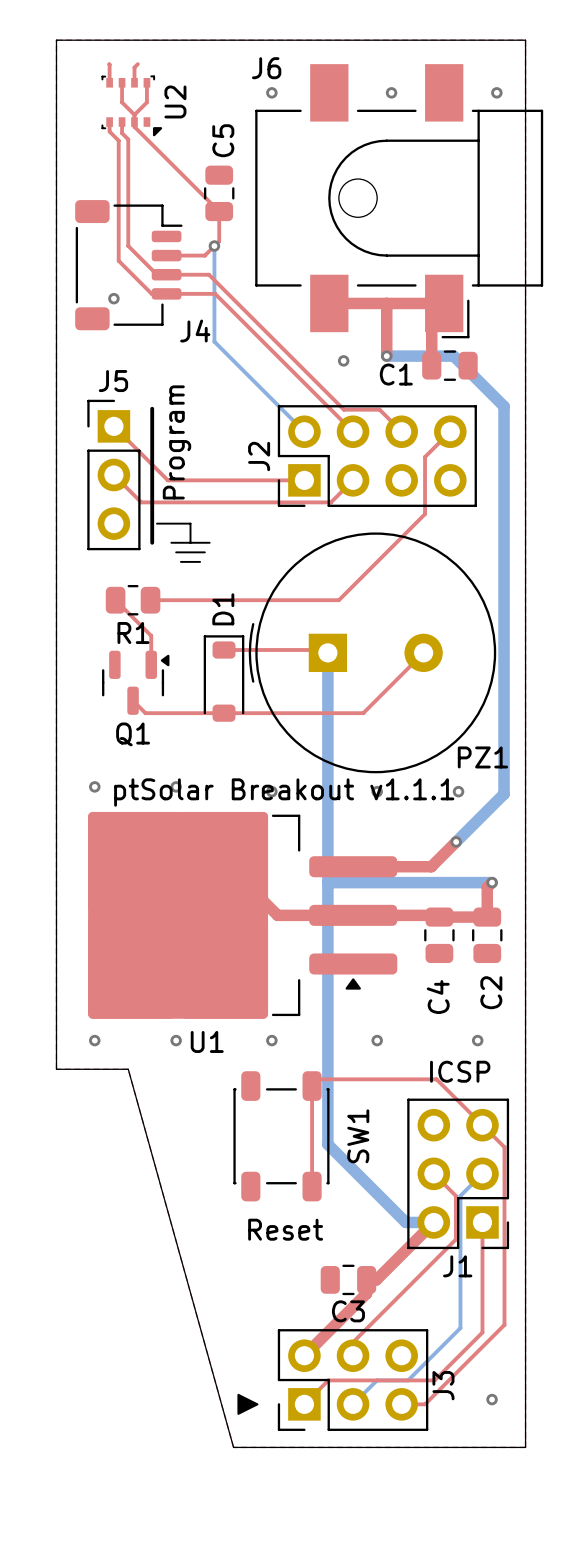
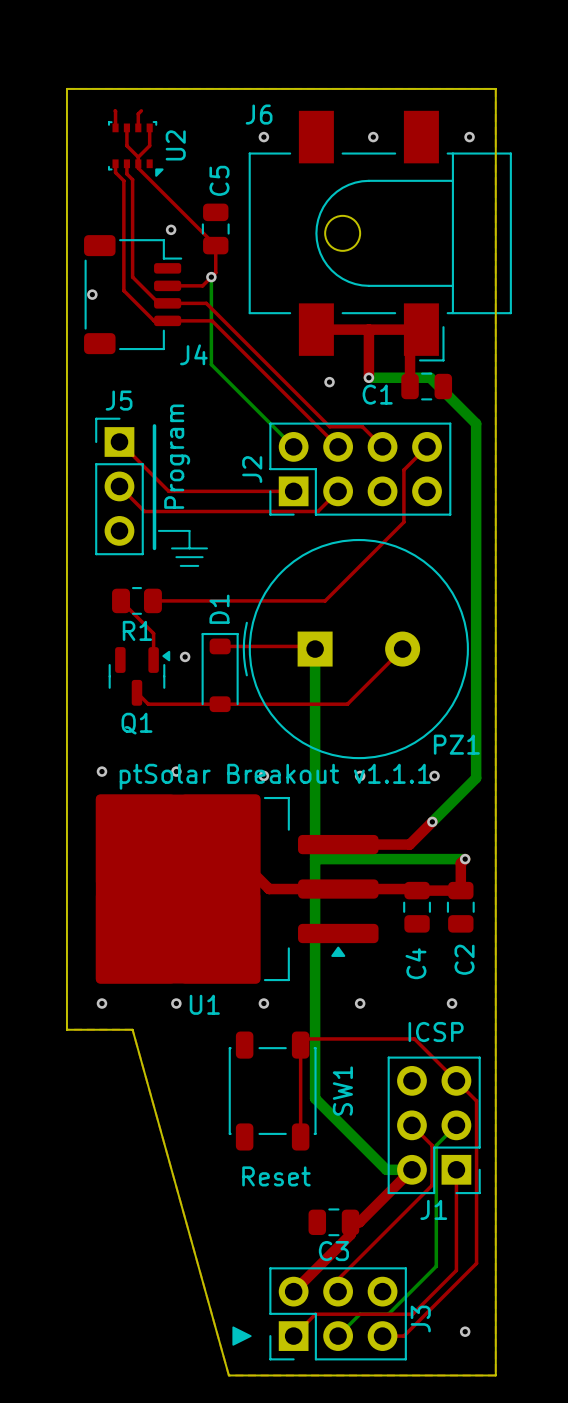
via: none -> (171, 229)
via position: (113, 298) -> (92, 294)
via: none -> (185, 656)

